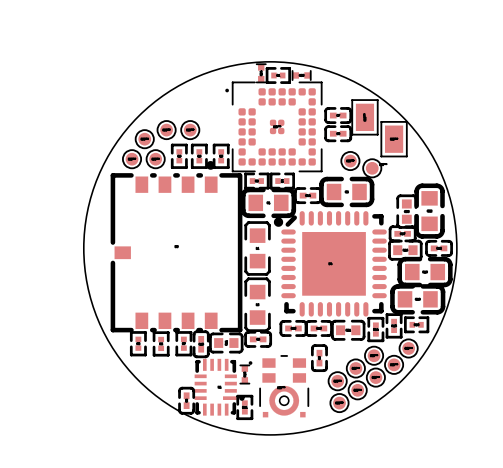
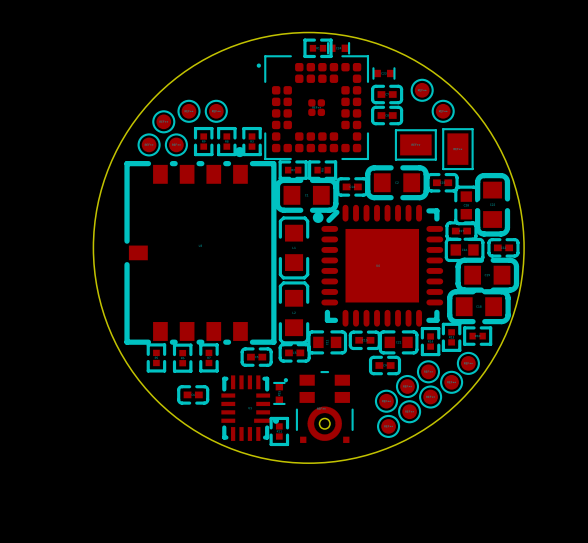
part rotation: 0° (261, 73) -> 90° clockwise (338, 48)
part position: (261, 73) -> (338, 48)
part position: (301, 75) -> (383, 73)
part footprint: [351, 99, 379, 136] -> [410, 78, 434, 102]
part footprint: [380, 120, 408, 158] -> [431, 99, 455, 123]
part: none -> (415, 144)
part: (350, 161) -> none
part: none -> (457, 149)
part: (372, 168) -> none
part: none -> (442, 182)
part: (293, 328) -> none
part: none -> (256, 357)
part position: (226, 343) -> (327, 342)
part: (201, 344) -> none
part rotation: 0° (319, 358) -> 90° clockwise (385, 365)
part position: (319, 358) -> (385, 365)
part rotation: 0° (186, 400) -> 90° clockwise (193, 394)
part position: (186, 400) -> (193, 394)

